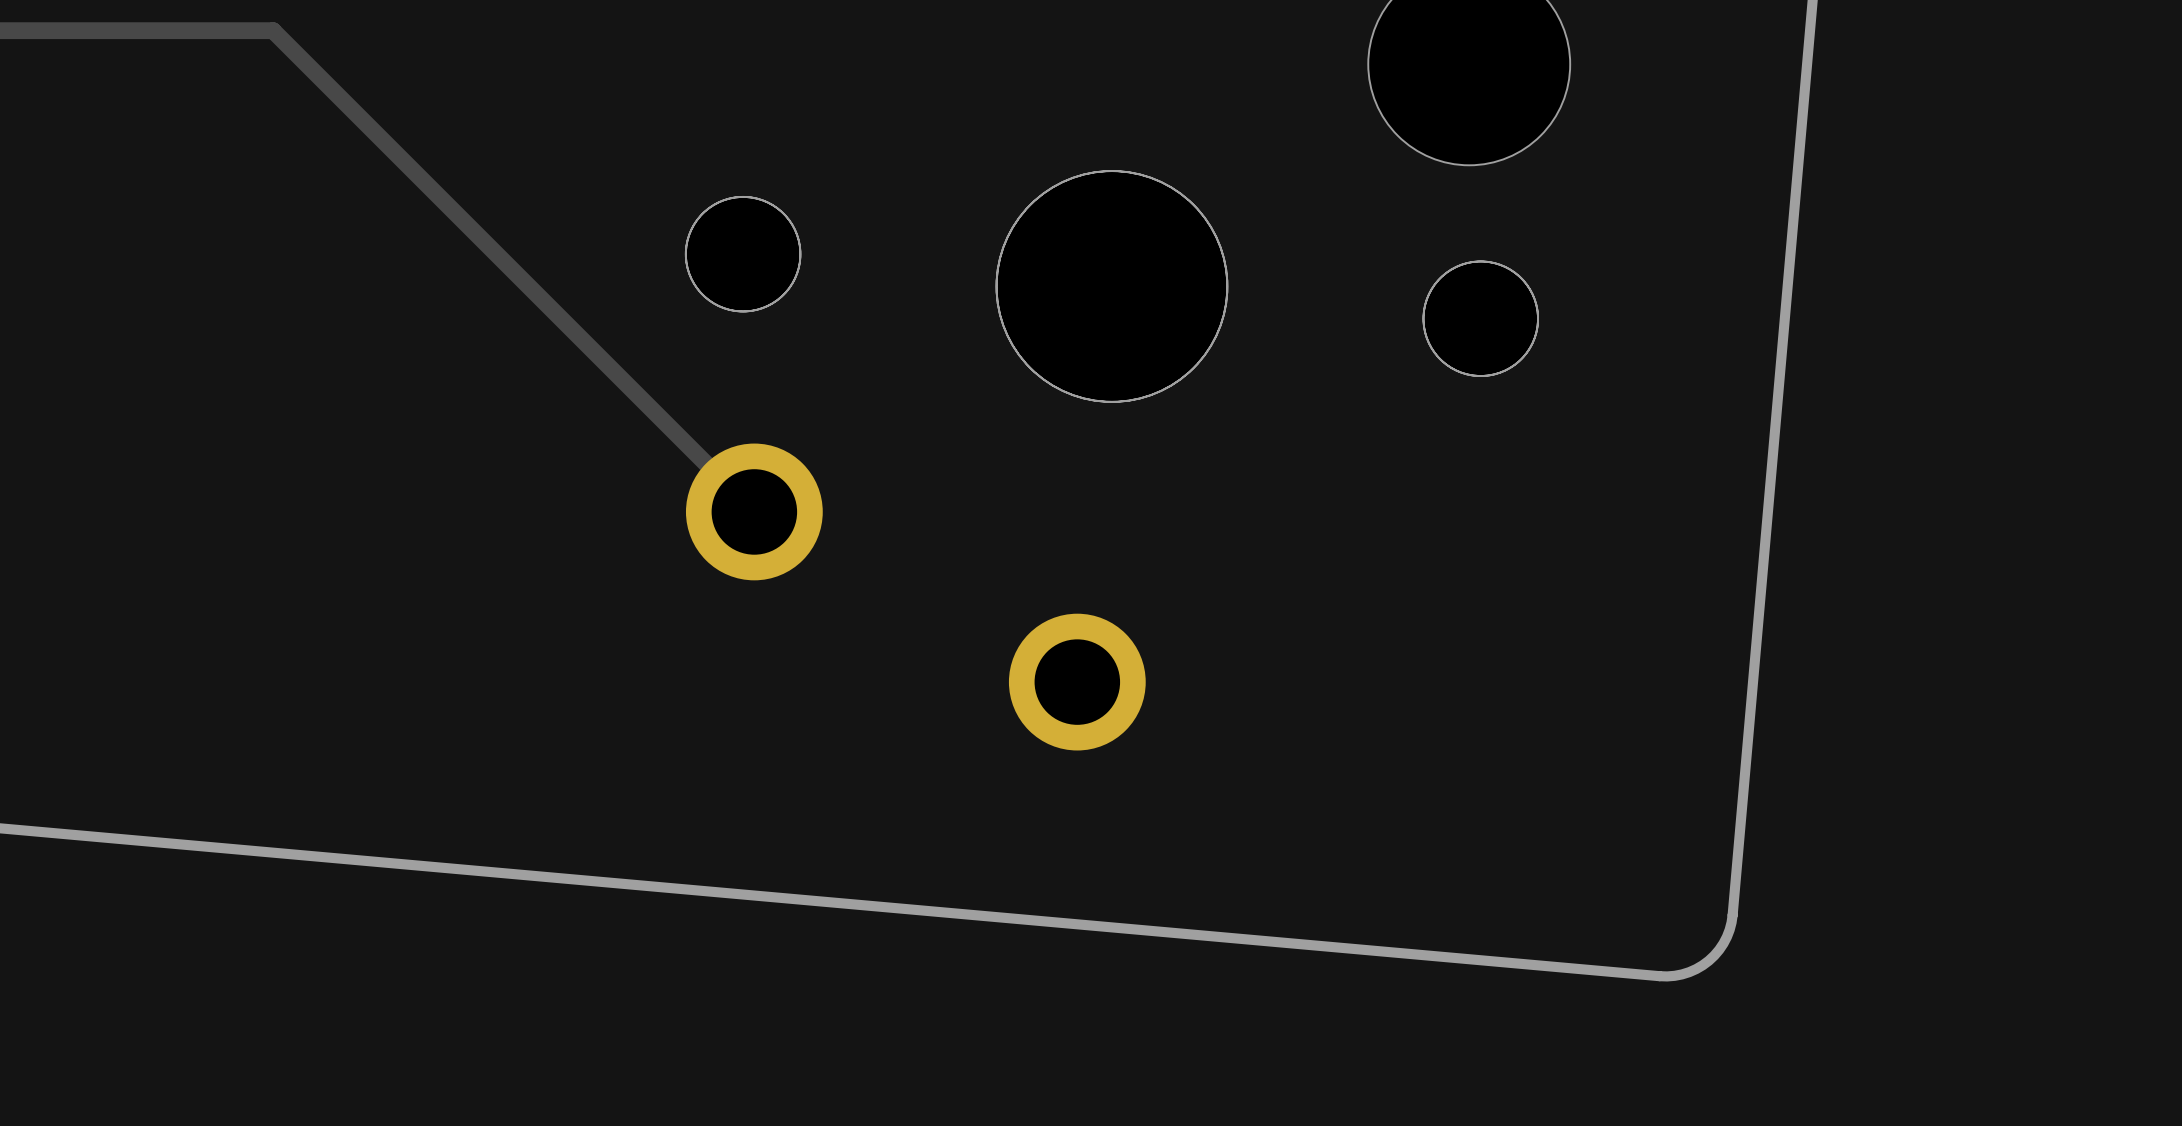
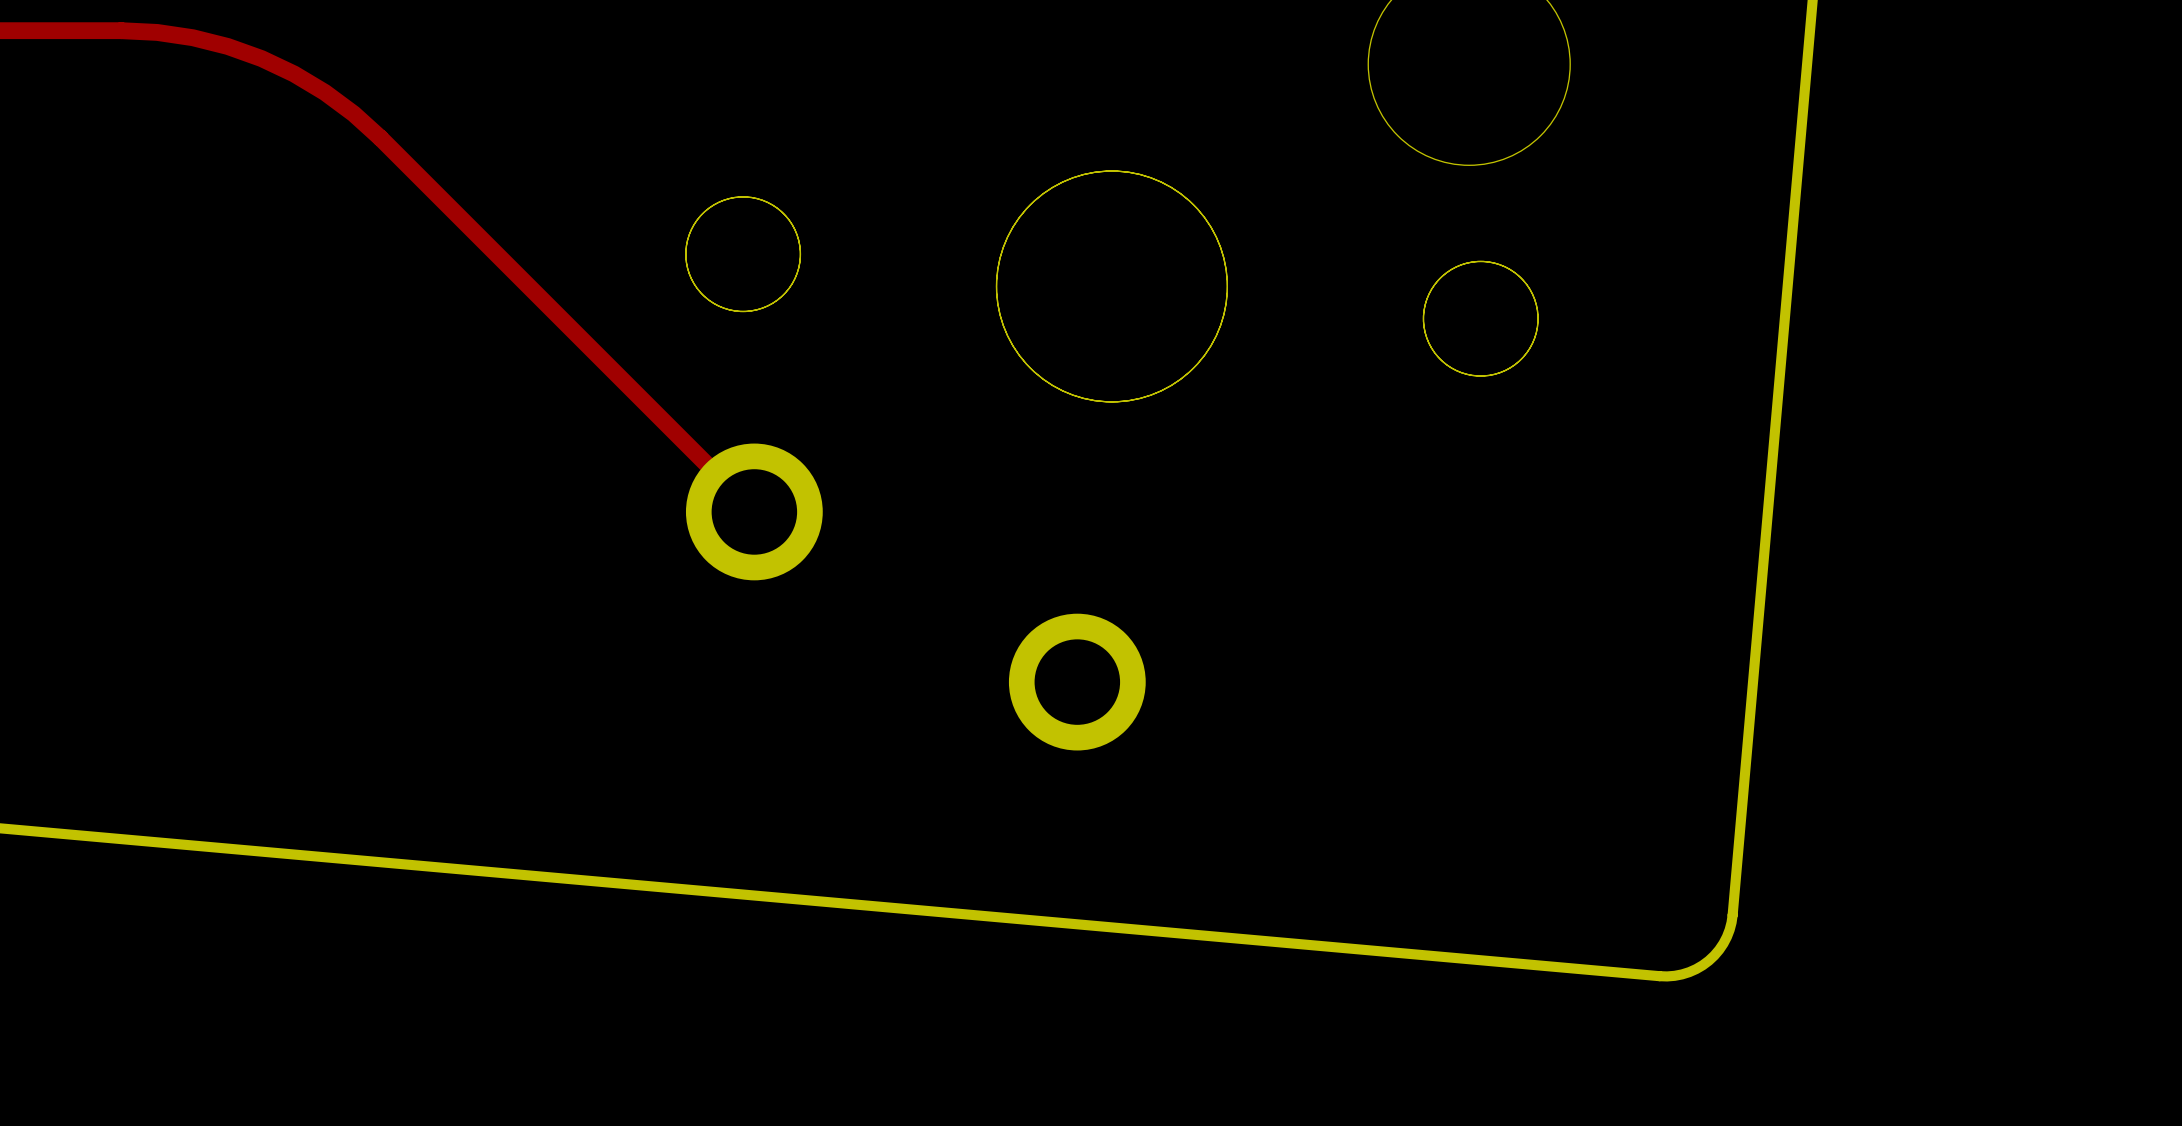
track: (121, 30) (273, 30) (380, 137) -> (121, 30) (157, 32) (192, 37) (227, 46) (261, 58) (294, 73) (324, 92) (353, 113) (380, 137)

